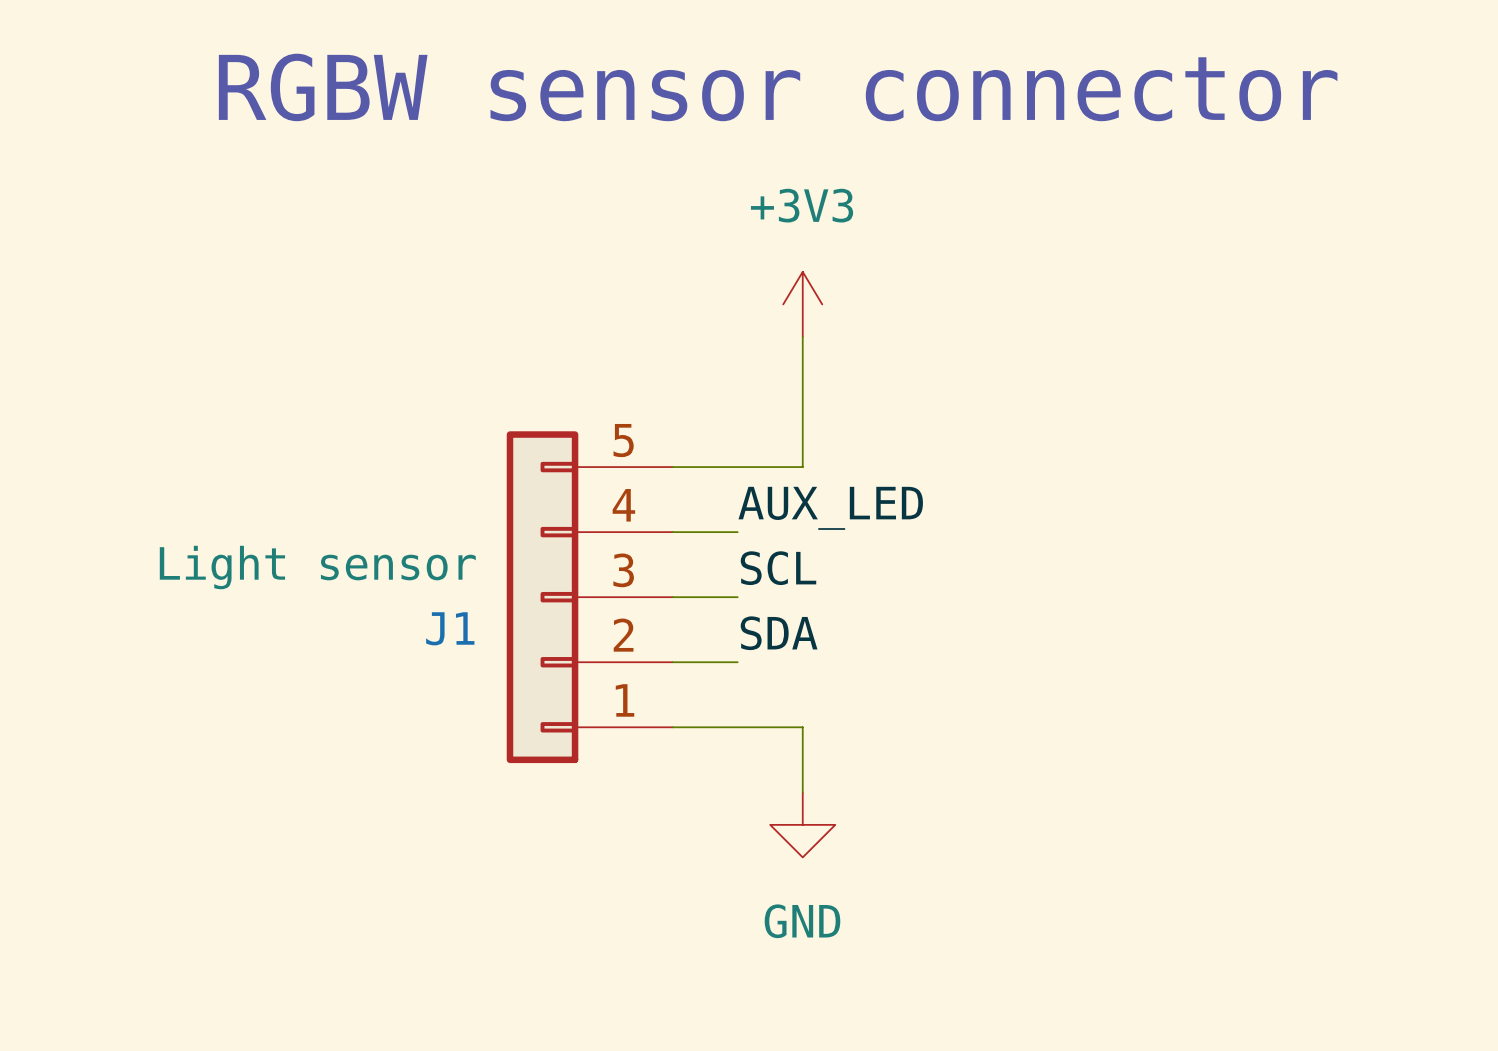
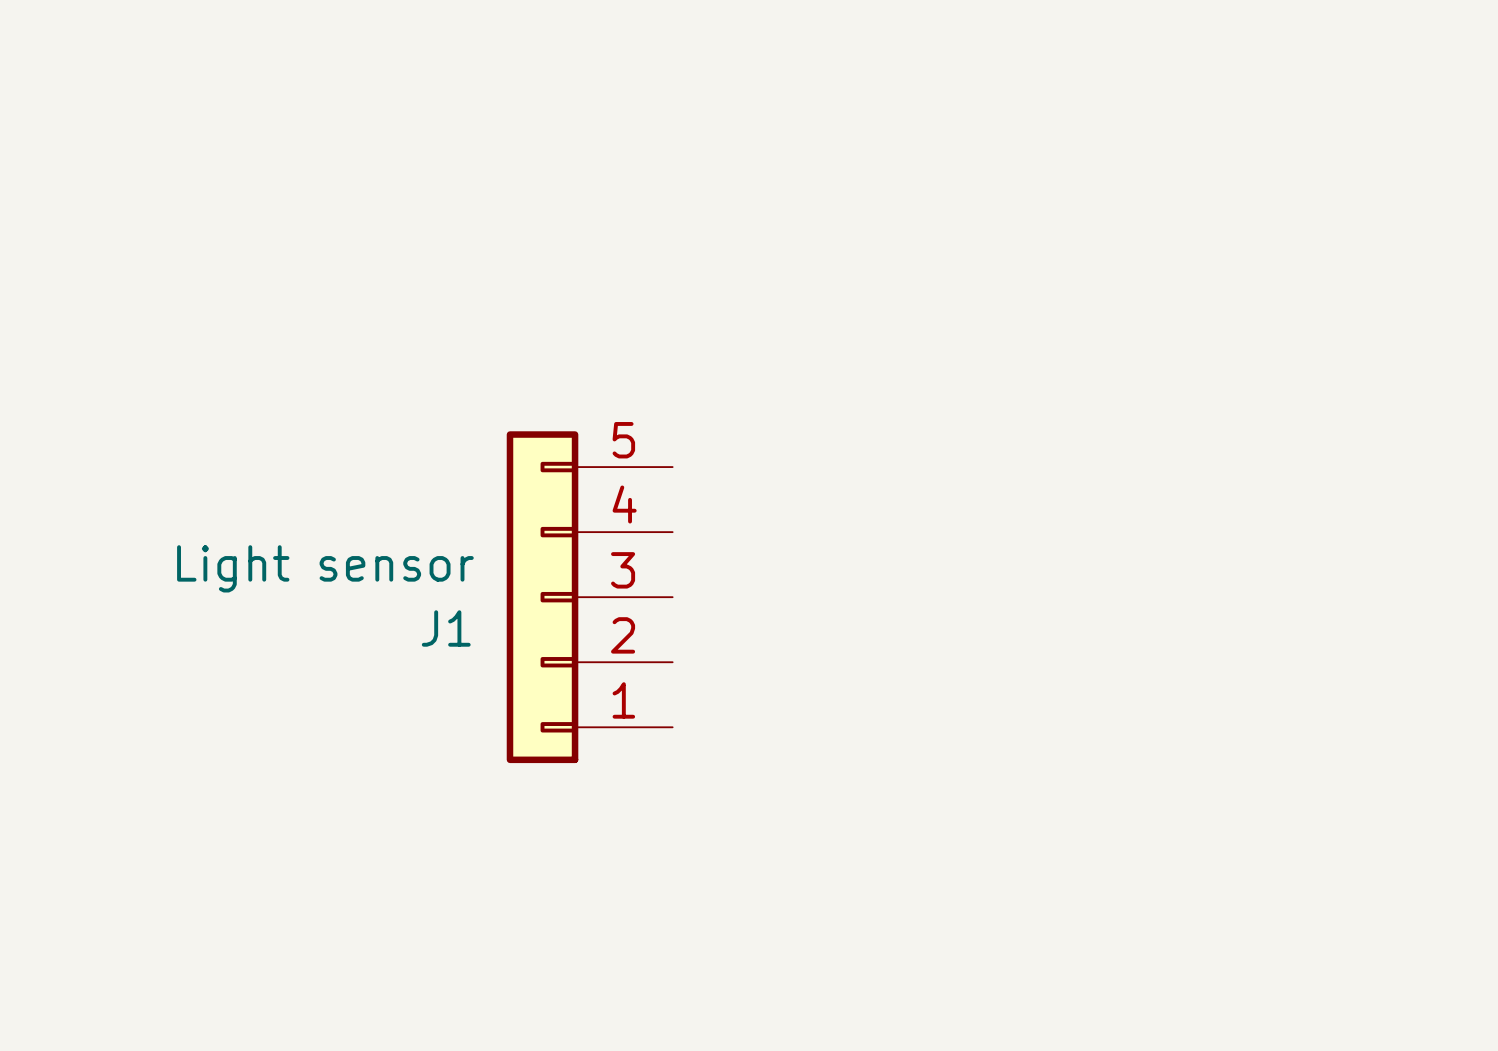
text: RGBW sensor connector (778, 87) -> none
power symbol: +3V3 (802, 304) -> none
wire: (802, 336) (802, 467) (672, 467) -> none
label: AUX_LED (830, 508) -> none
wire: (672, 532) (737, 532) -> none
label: SCL (778, 568) -> none
wire: (672, 597) (737, 597) -> none
label: SDA (779, 633) -> none
wire: (672, 662) (737, 662) -> none
wire: (672, 727) (802, 727) (802, 792) -> none
power symbol: GND (802, 824) -> none

